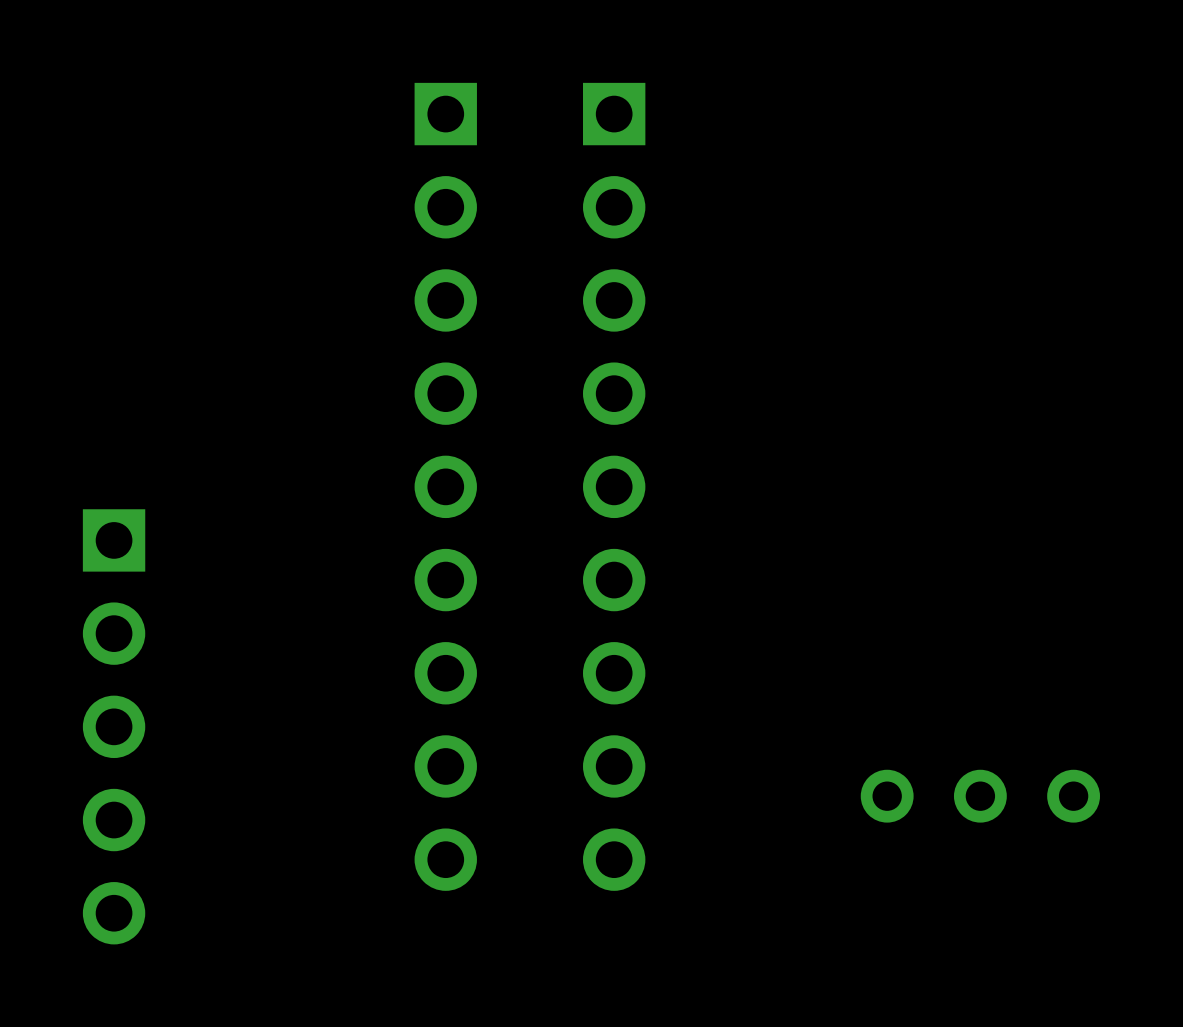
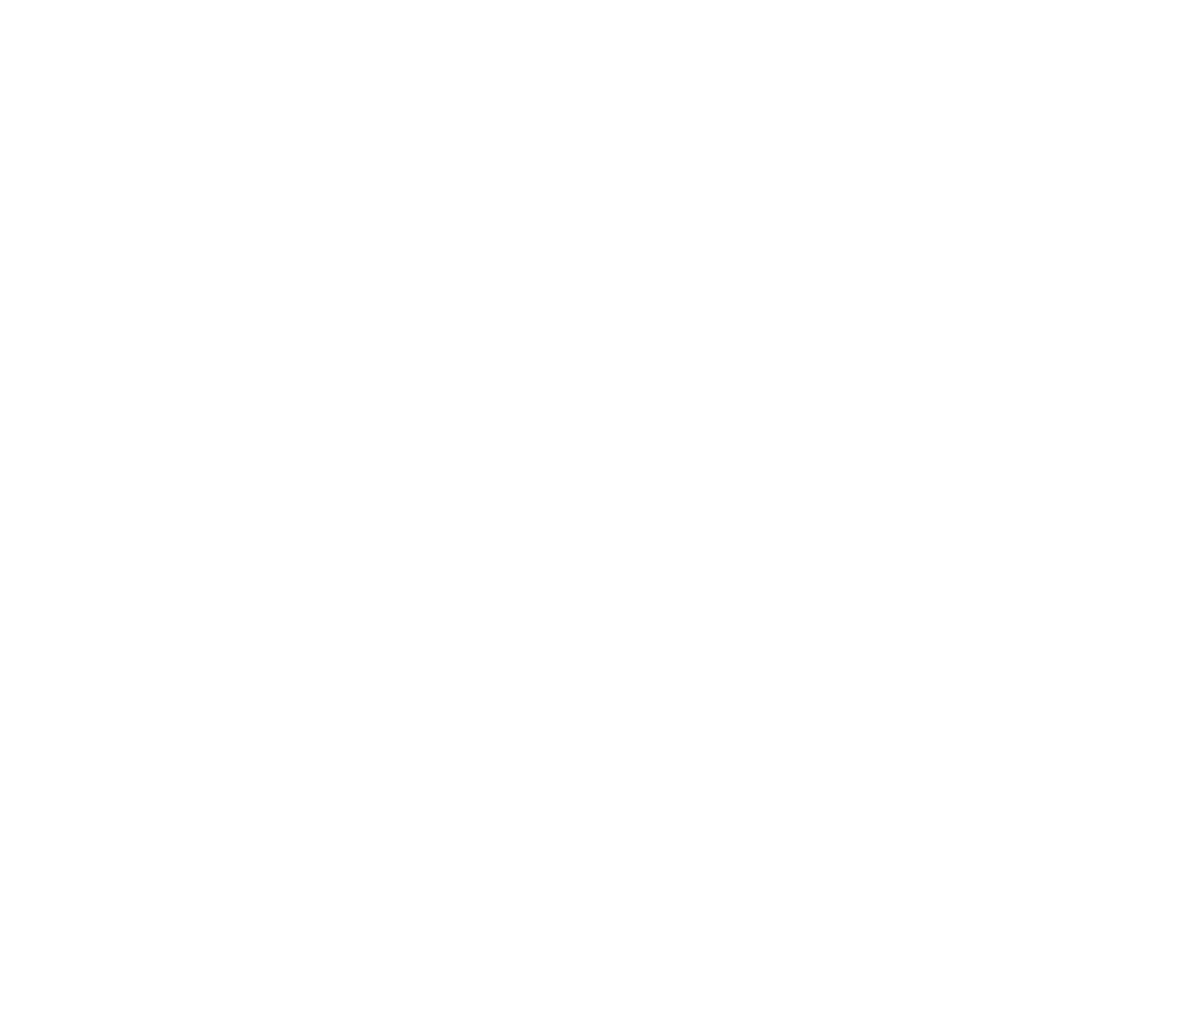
part: (445, 486) -> none
part: (614, 486) -> none
part: (114, 726) -> none
part: (980, 796) -> none

